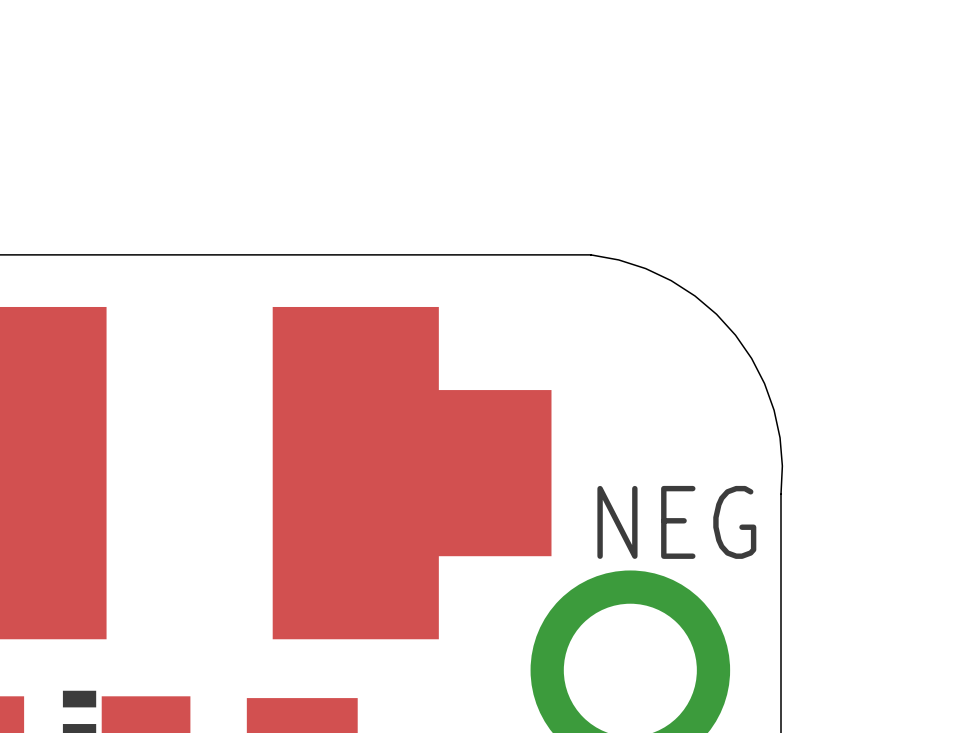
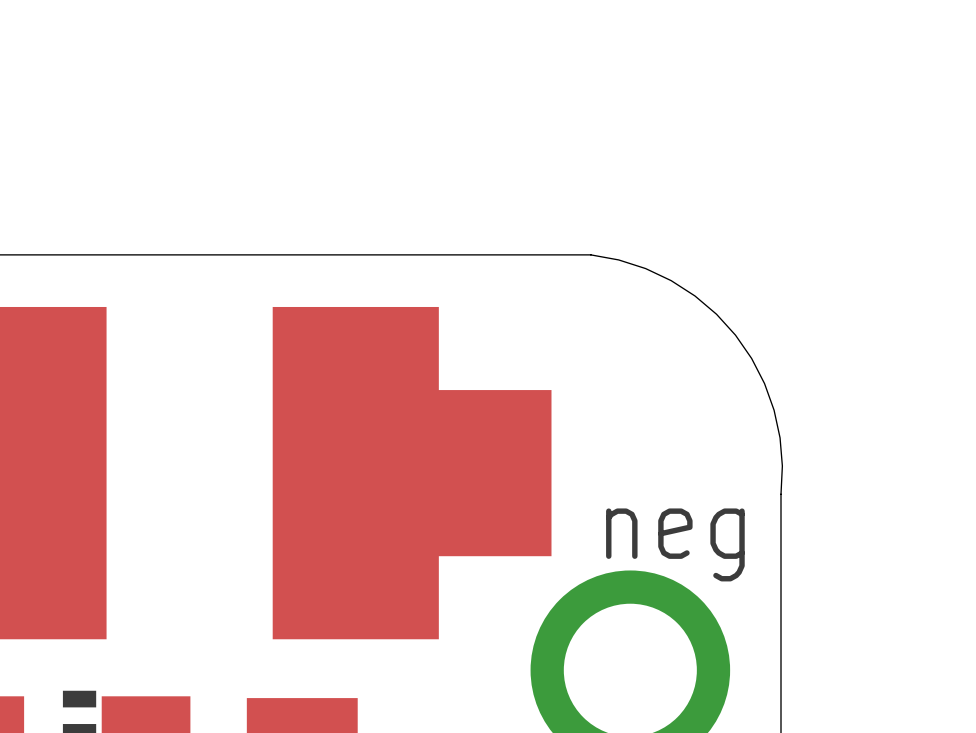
text: NEG (676, 522) -> neg (675, 544)

